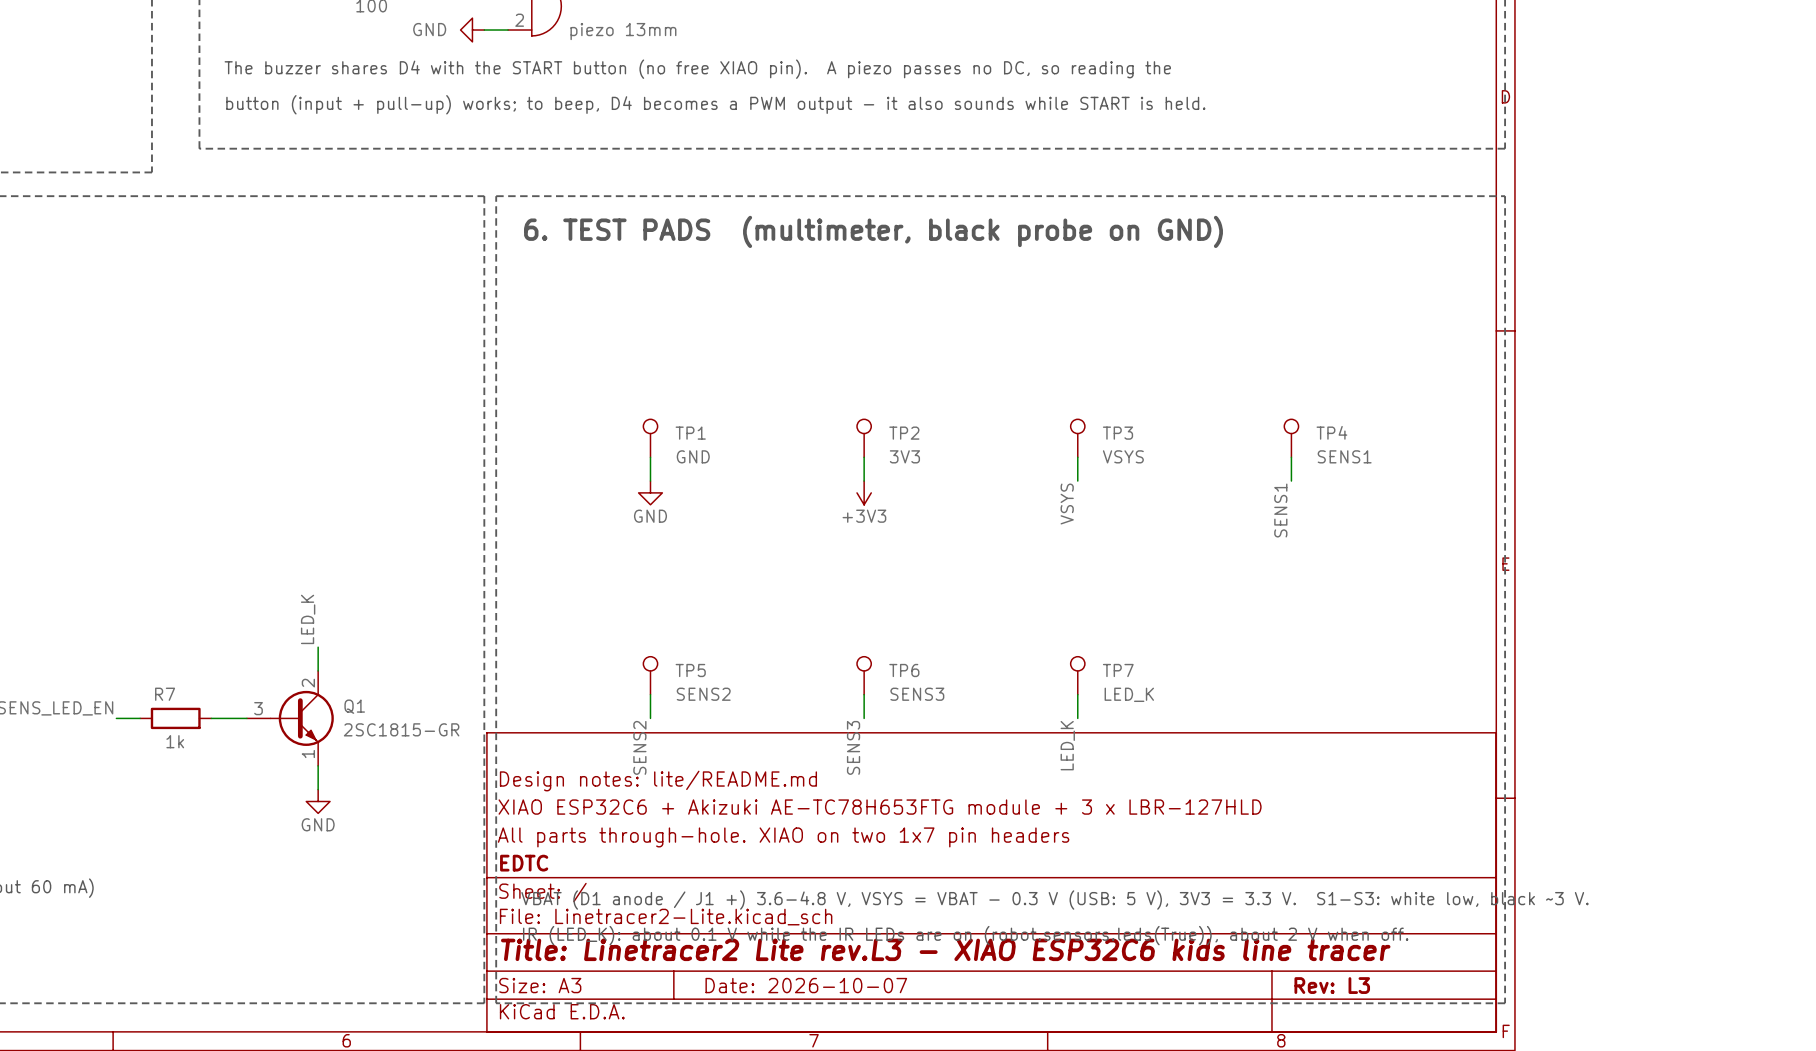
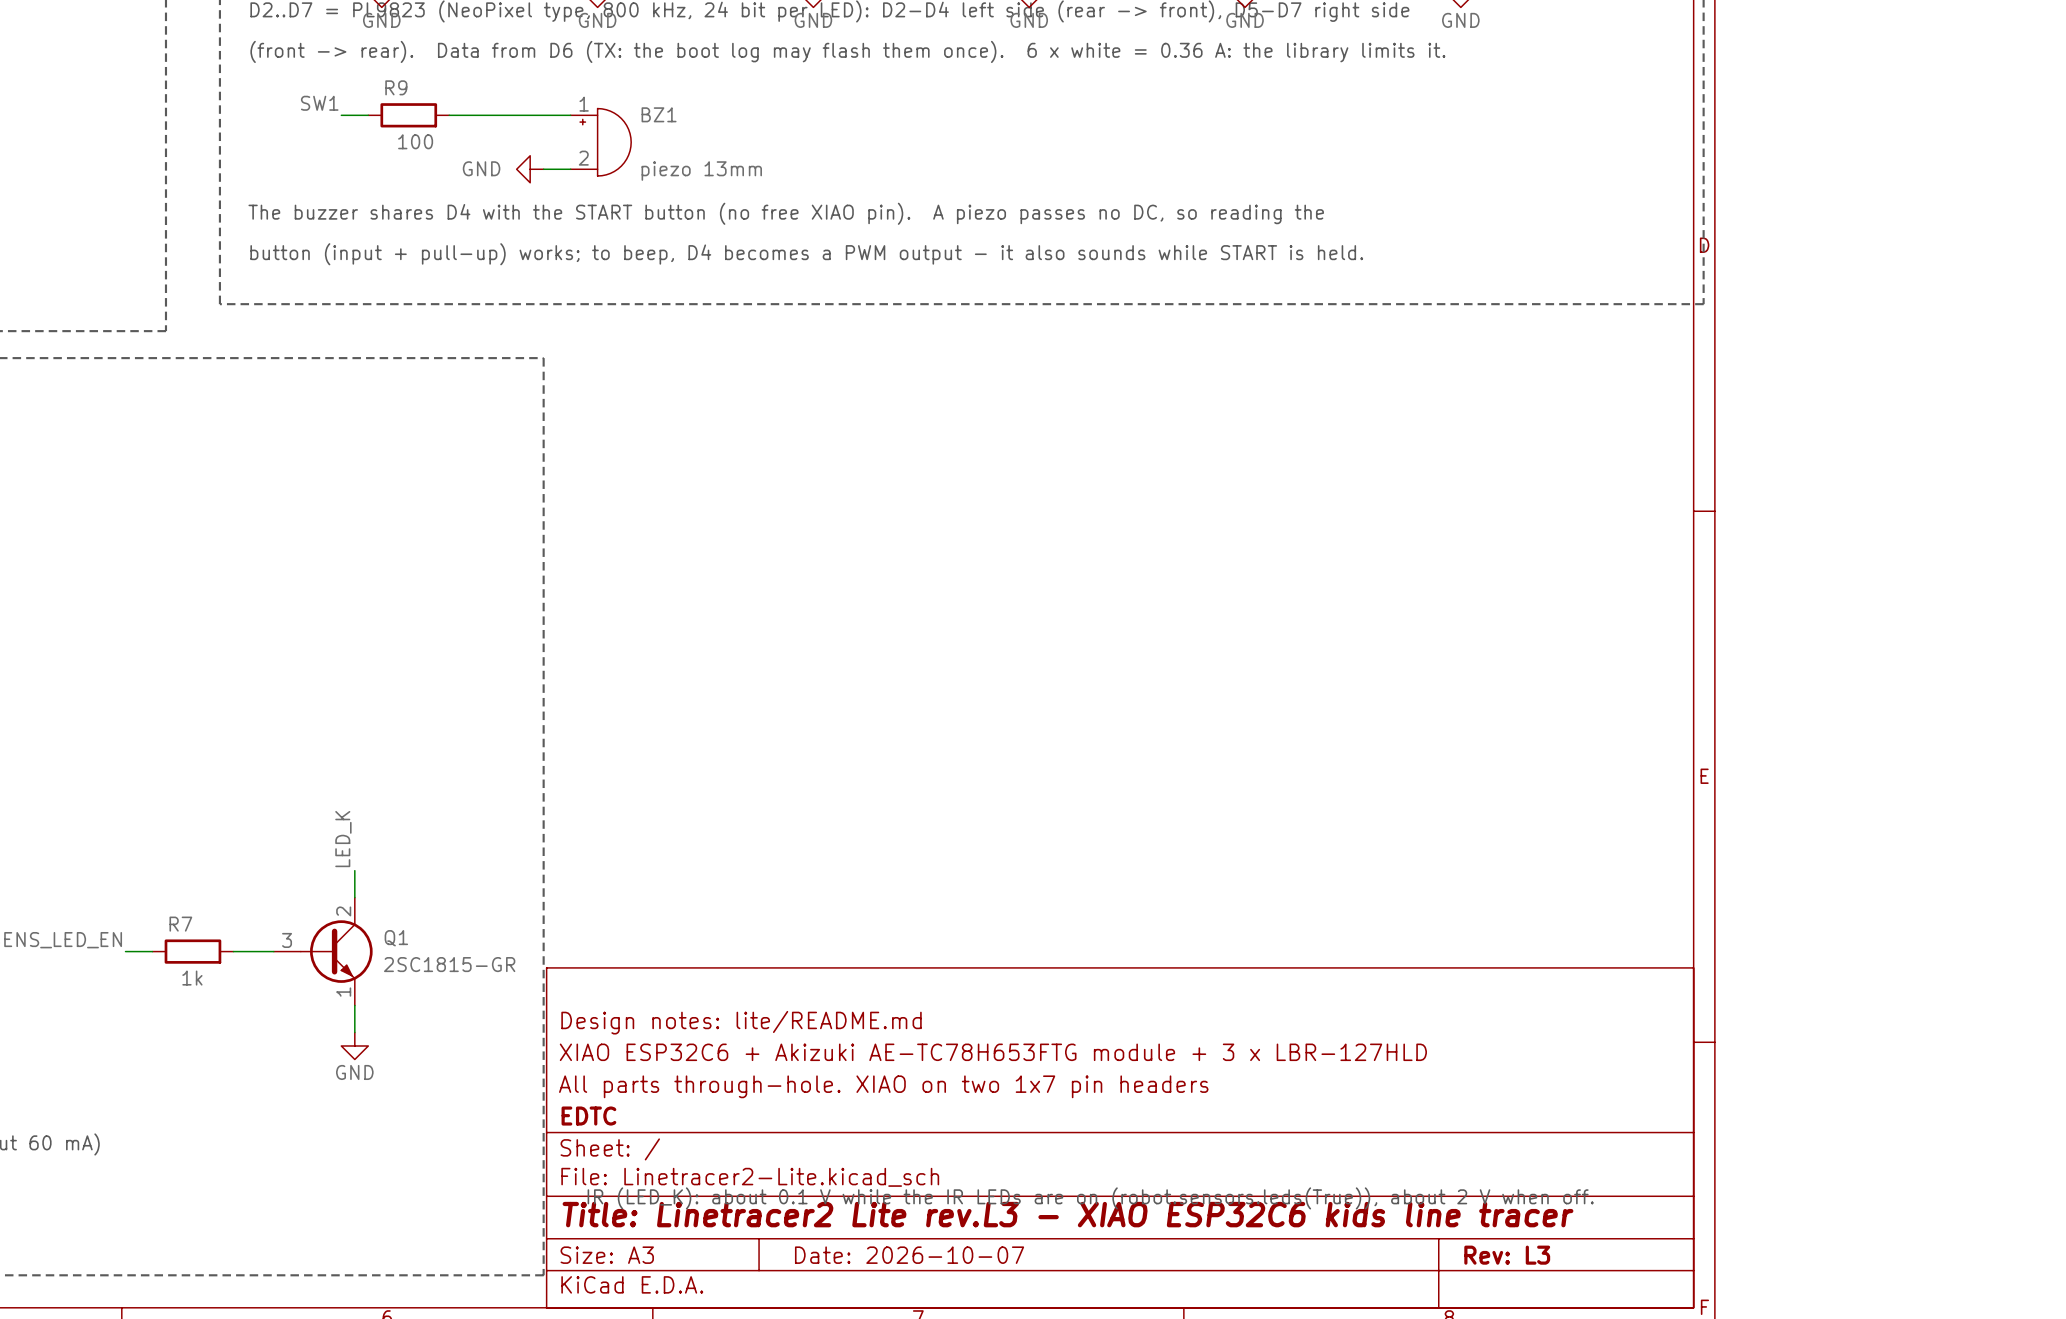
line: (496, 196) (1505, 196) (1505, 1003) (496, 1003) (496, 196) -> none
text: 6. TEST PADS (multimeter, black probe on GND) (873, 231) -> none
TP1: GND (650, 438) -> none
TP2: 3V3 (864, 438) -> none
TP3: VSYS (1077, 438) -> none
TP4: SENS1 (1291, 438) -> none
wire: (650, 457) (650, 481) -> none
wire: (864, 457) (864, 481) -> none
wire: (1077, 457) (1077, 481) -> none
wire: (1291, 457) (1291, 481) -> none
power symbol: GND (650, 492) -> none
power symbol: +3V3 (864, 492) -> none
label: VSYS (1067, 504) -> none
label: SENS1 (1280, 510) -> none
TP5: SENS2 (650, 675) -> none
TP6: SENS3 (864, 675) -> none
TP7: LED_K (1077, 675) -> none
wire: (650, 694) (650, 718) -> none
wire: (864, 694) (864, 718) -> none
wire: (1077, 694) (1077, 718) -> none
label: LED_K (1067, 745) -> none
label: SENS2 (639, 747) -> none
label: SENS3 (853, 747) -> none
text: VBAT (D1 anode / J1 +) 3.6-4.8 V, VSYS = VBAT - 0.3 V (USB: 5 V), 3V3 = 3.3 V. S1-S3: white low, black ~3 V. (1054, 900) -> none

